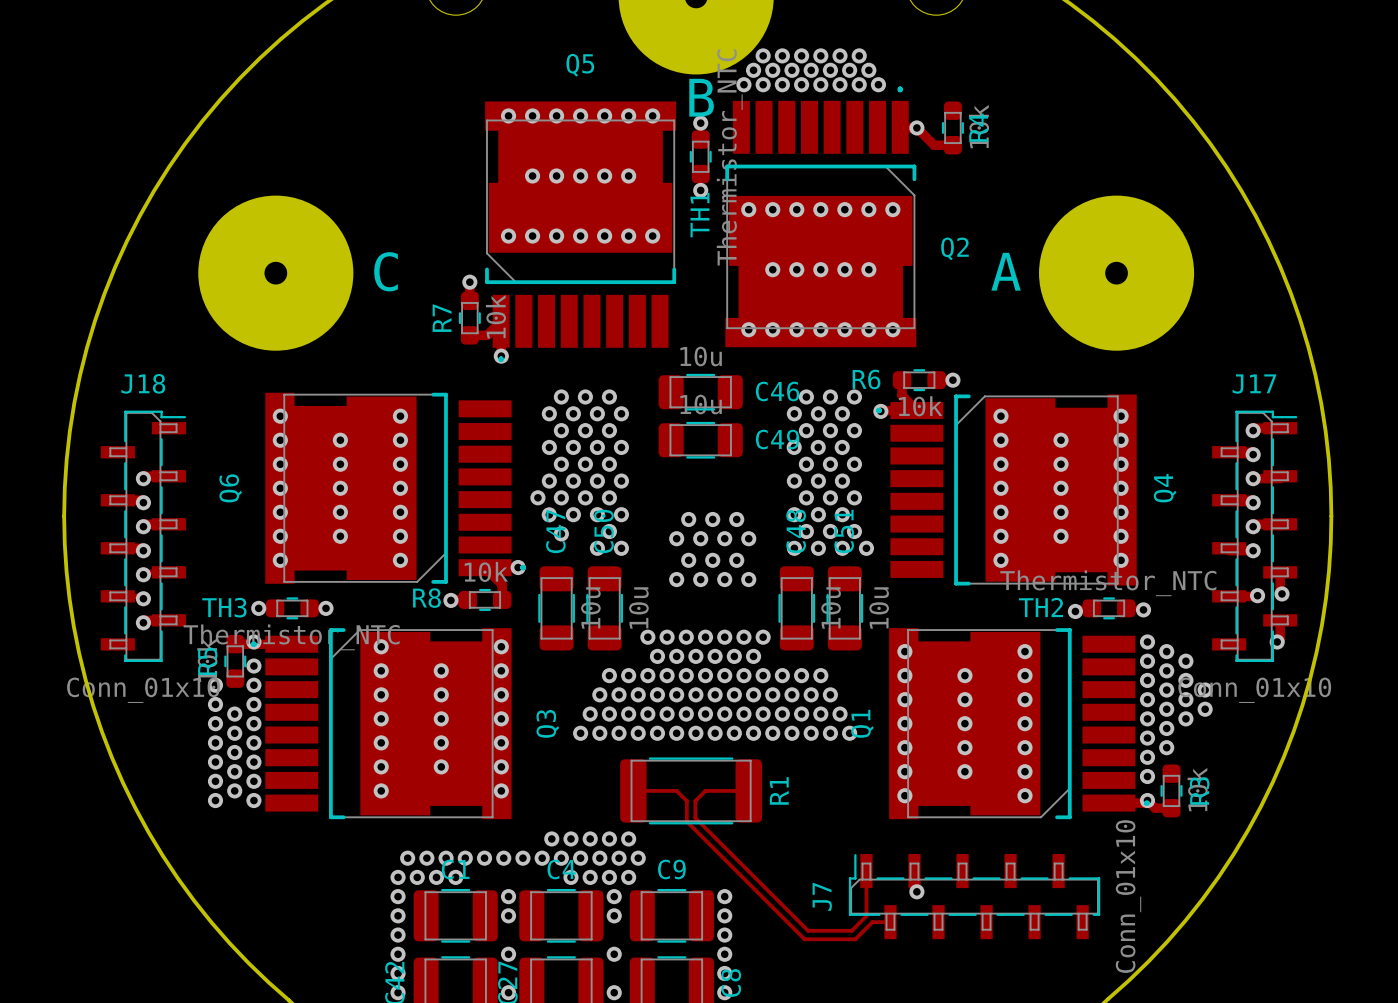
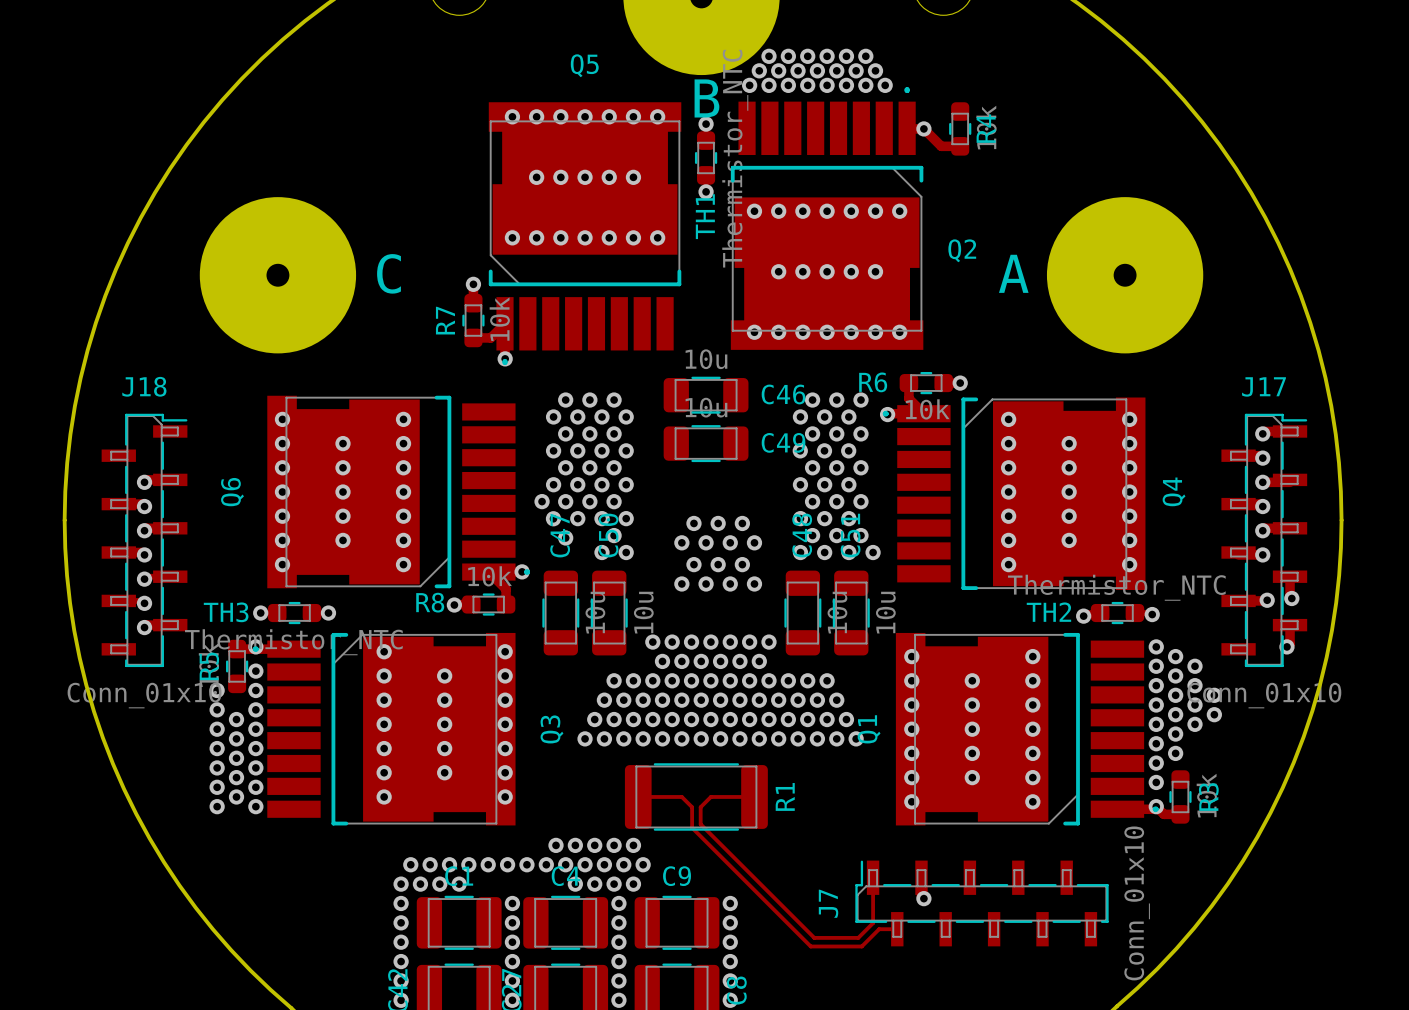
via: none -> (512, 942)
via: none -> (618, 942)
via: none -> (512, 980)
via: none -> (618, 980)

